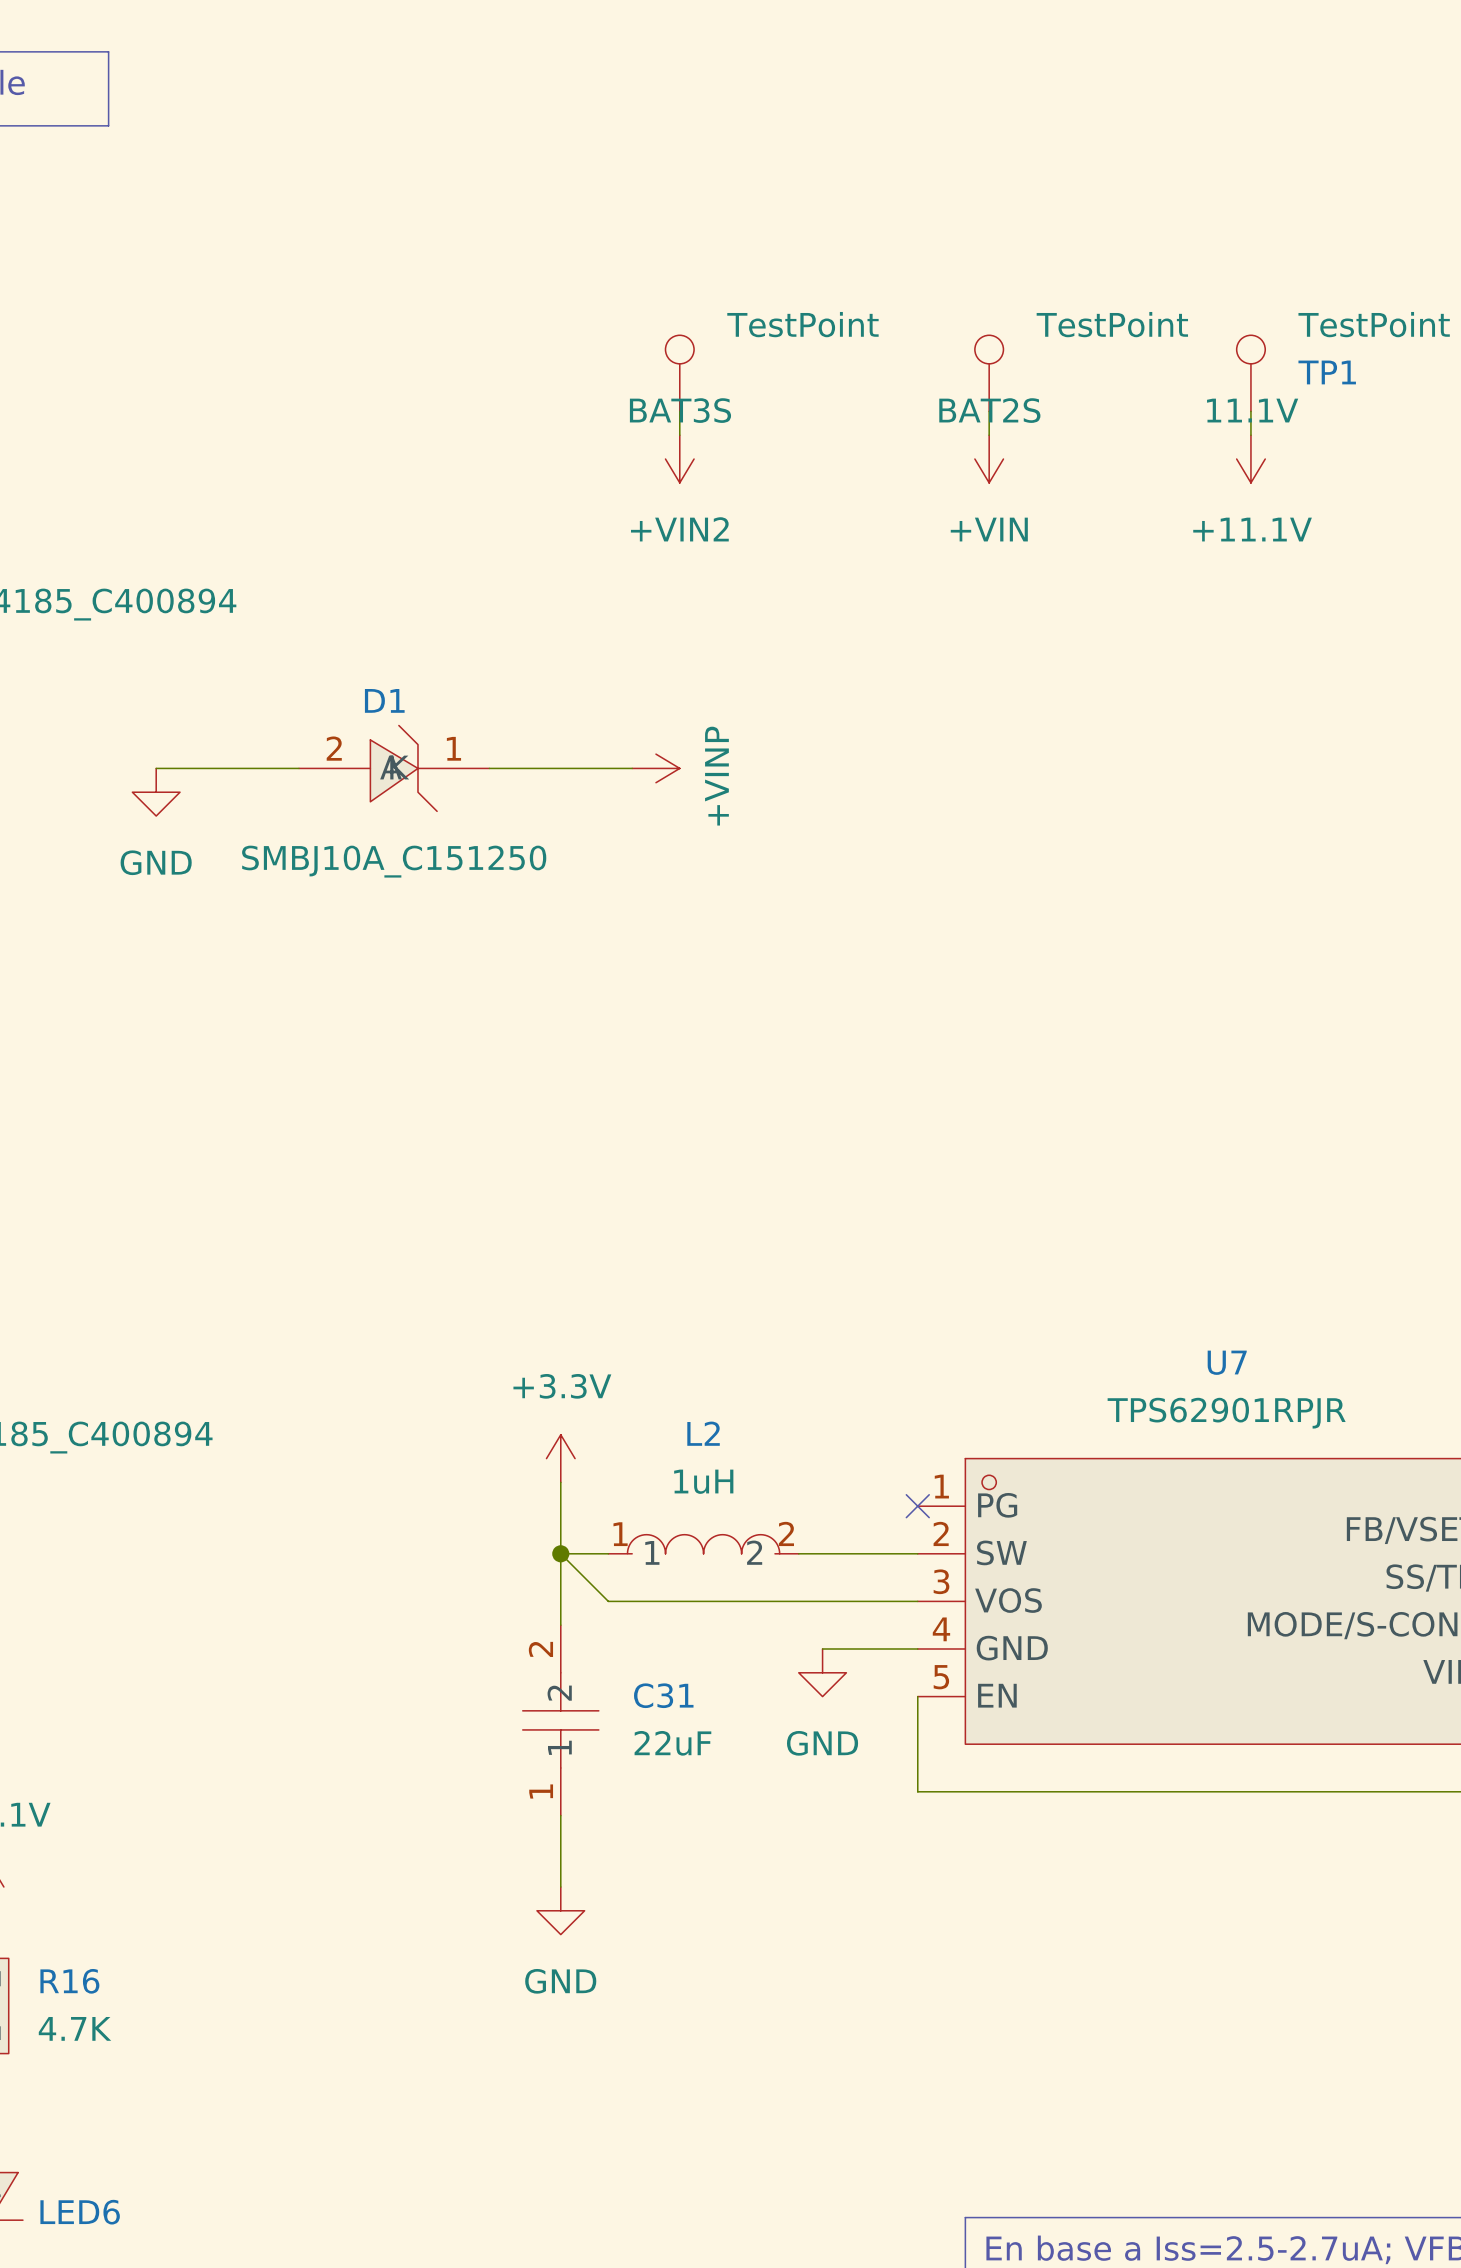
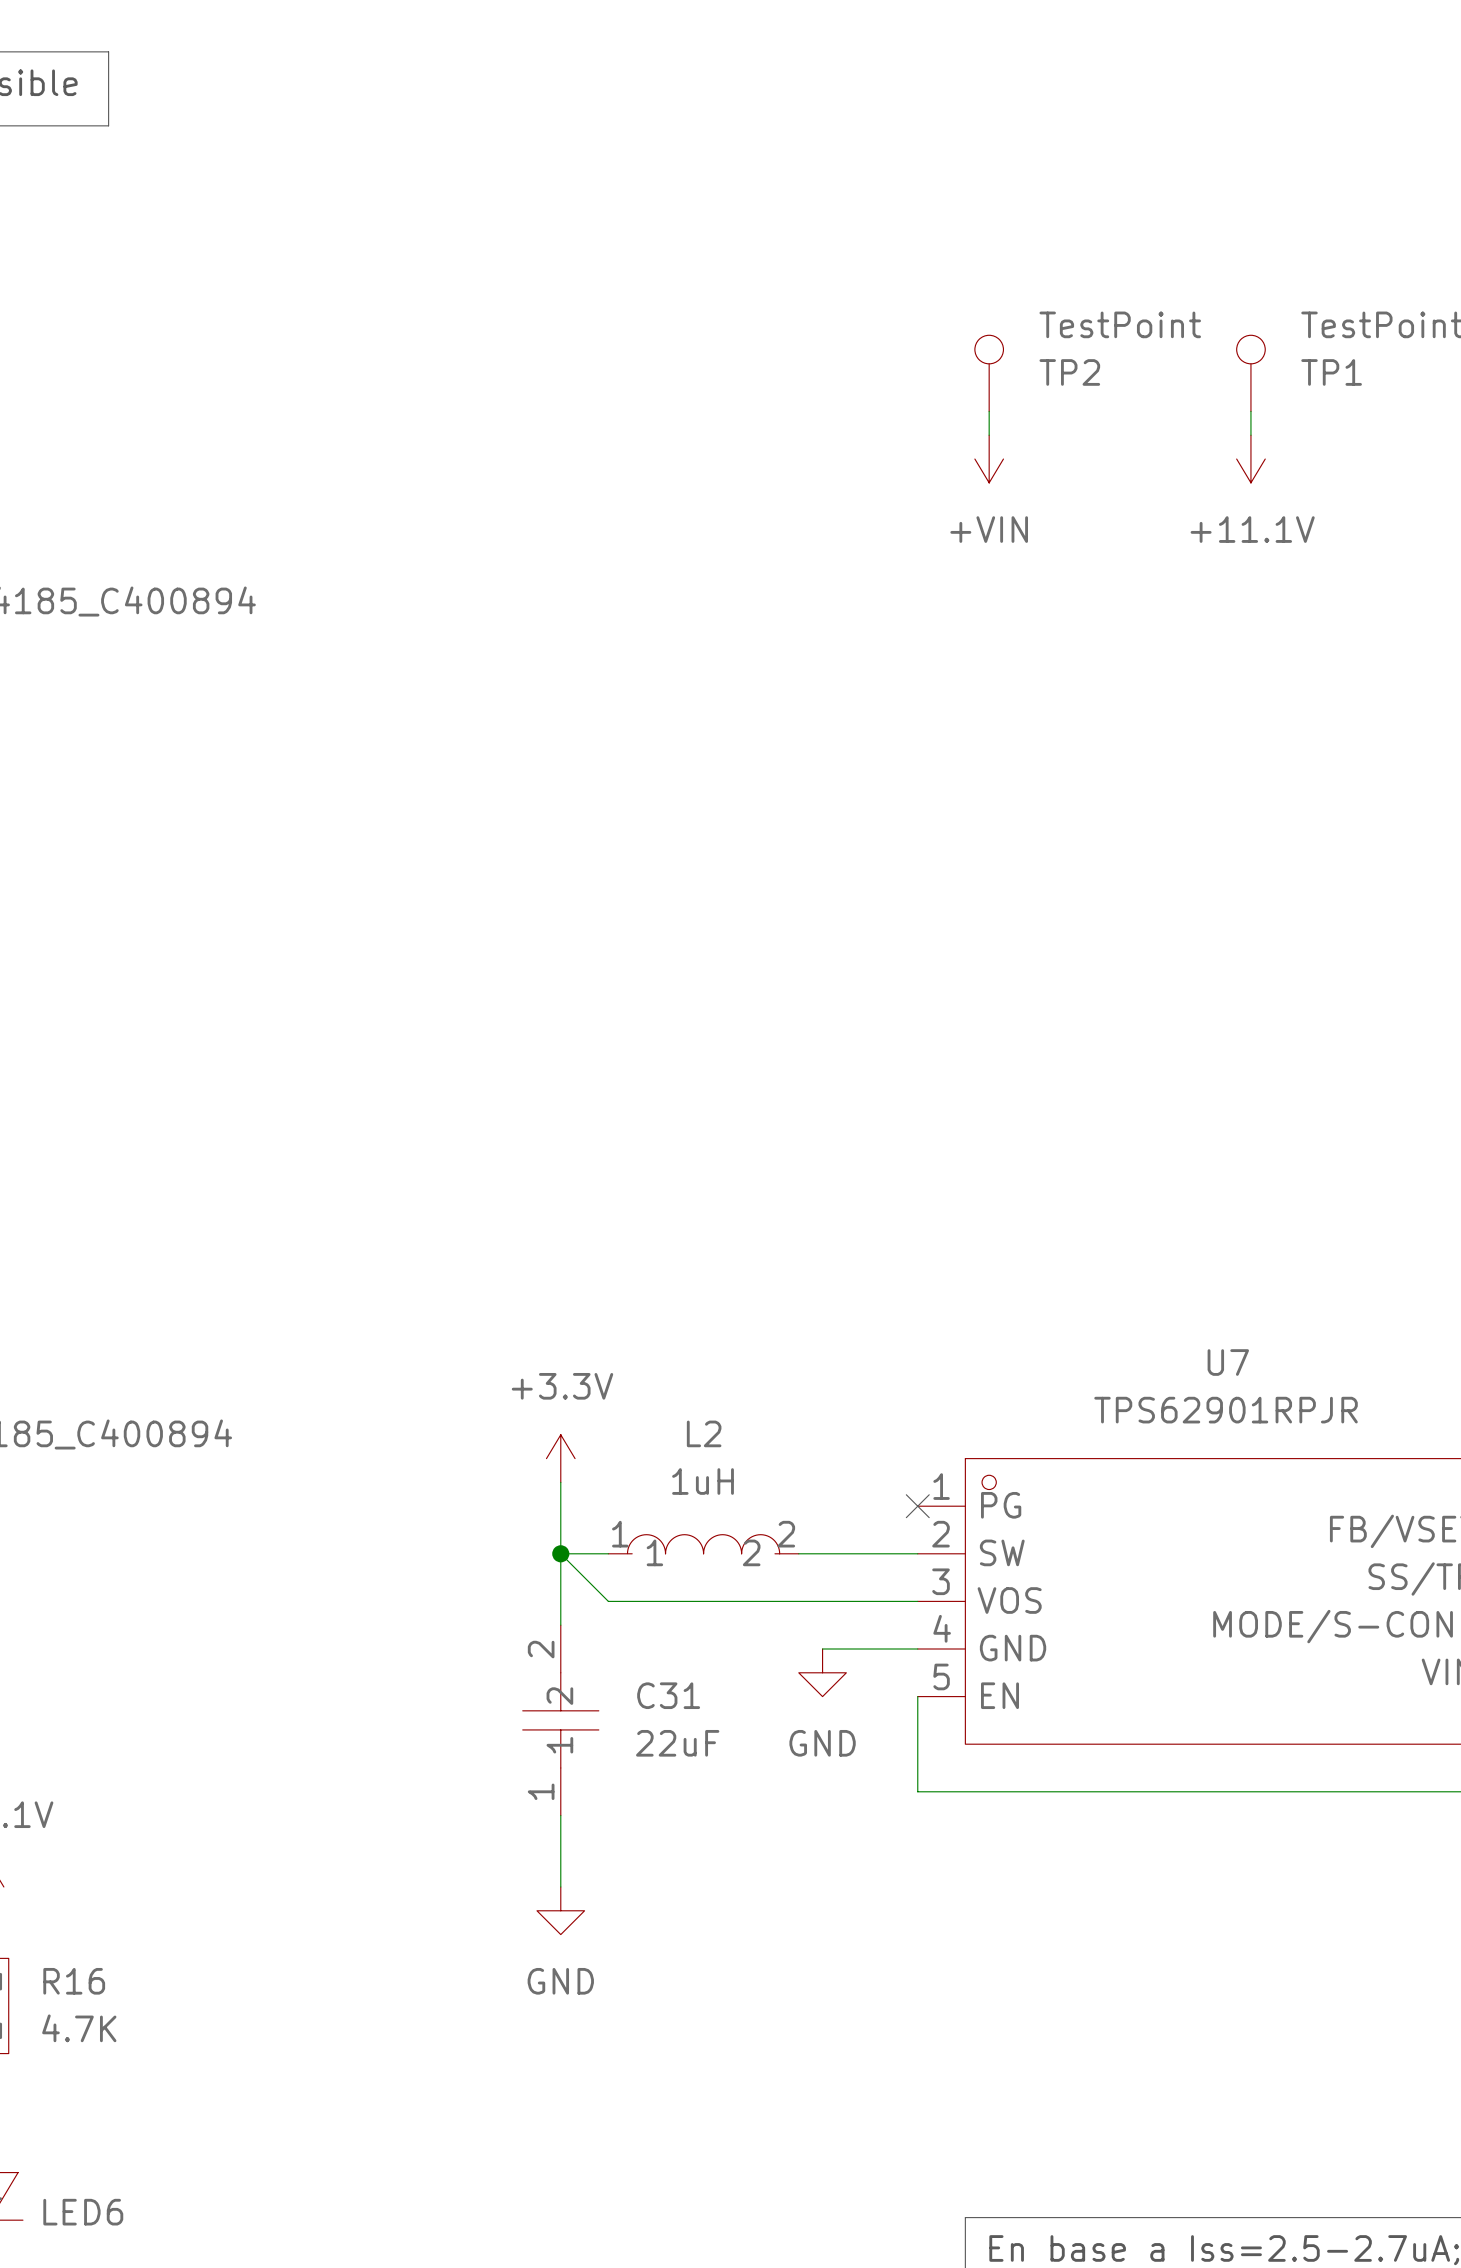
TP2 name: none -> TP2 (1069, 372)
part: TestPoint (679, 373) -> none
TP2 text: BAT2S (989, 410) -> none
TP1 text: 11.1V (1252, 410) -> none
wire: (679, 411) (679, 435) -> none
power symbol: +VIN2 (679, 459) -> none
wire: (156, 768) (298, 768) -> none
D1: SMBJ10A_C151250 (394, 768) -> none
wire: (489, 768) (632, 768) -> none
power symbol: +VINP (655, 768) -> none
power symbol: GND (156, 792) -> none

